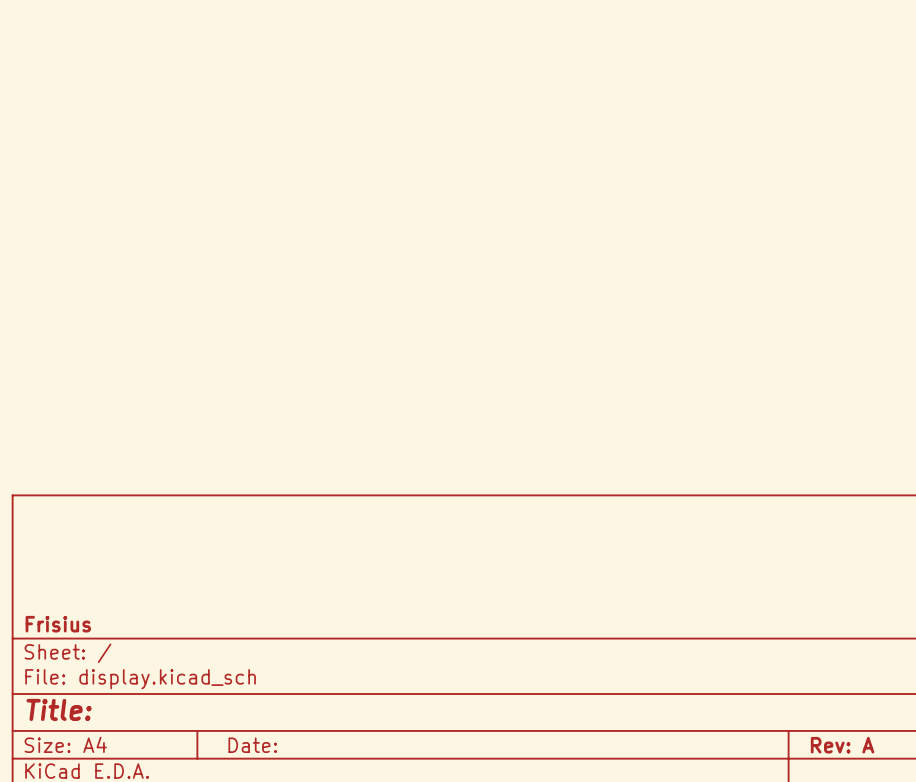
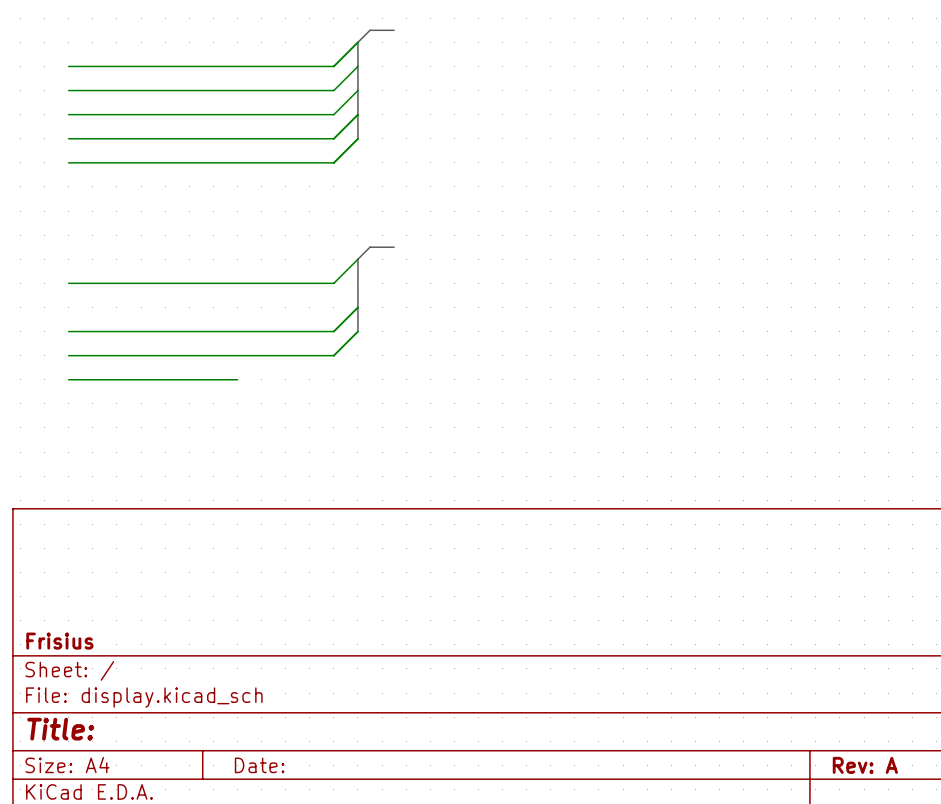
bus: none -> (394, 30) (370, 30) (357, 42) (357, 138)
wire: none -> (357, 42) (333, 66) (68, 66)
wire: none -> (357, 66) (333, 90) (68, 90)
wire: none -> (357, 90) (333, 114) (68, 114)
wire: none -> (357, 114) (333, 138) (68, 138)
wire: none -> (357, 138) (333, 162) (68, 162)
bus: none -> (394, 247) (370, 247) (357, 259) (357, 331)
wire: none -> (357, 259) (333, 283) (68, 283)
wire: none -> (357, 307) (333, 331) (68, 331)
wire: none -> (357, 331) (333, 355) (68, 355)
wire: none -> (68, 379) (237, 379)

